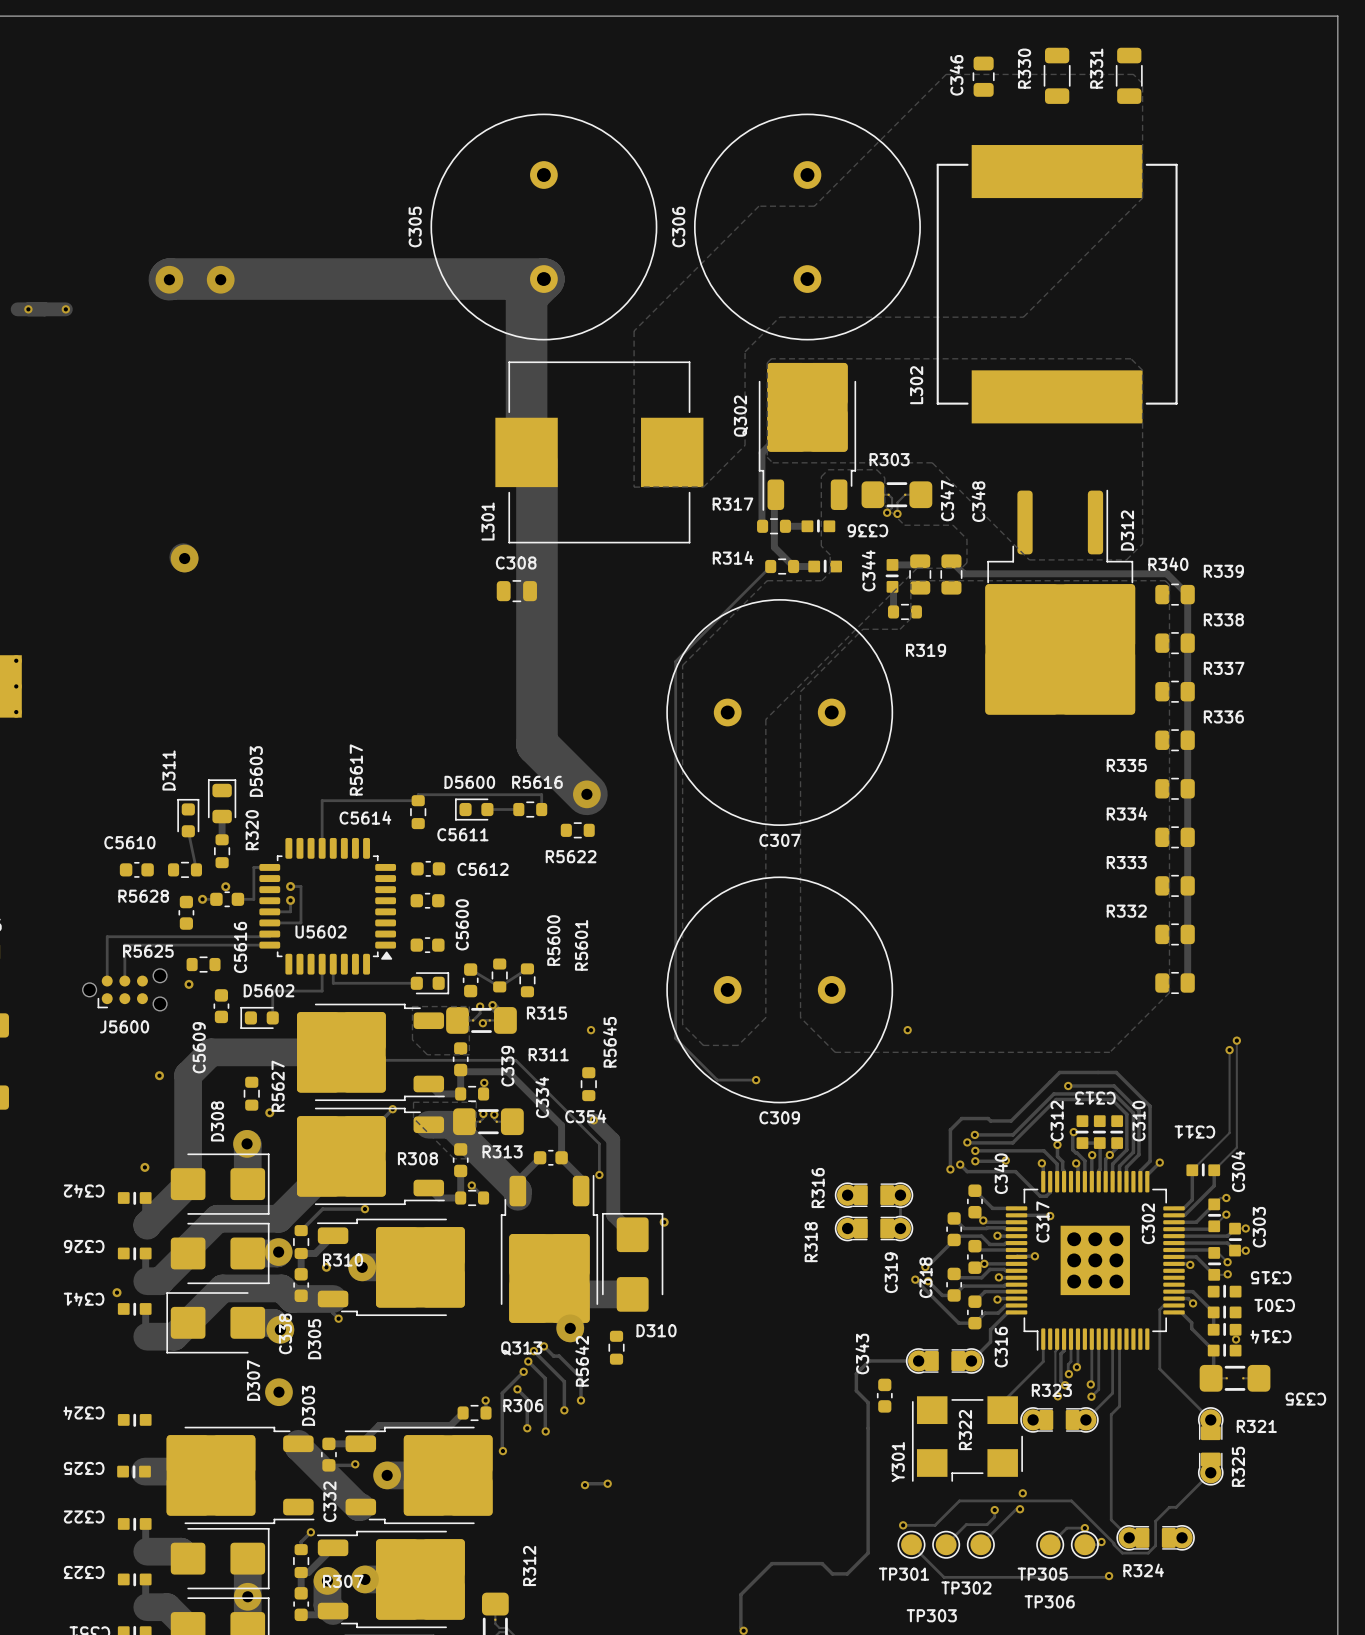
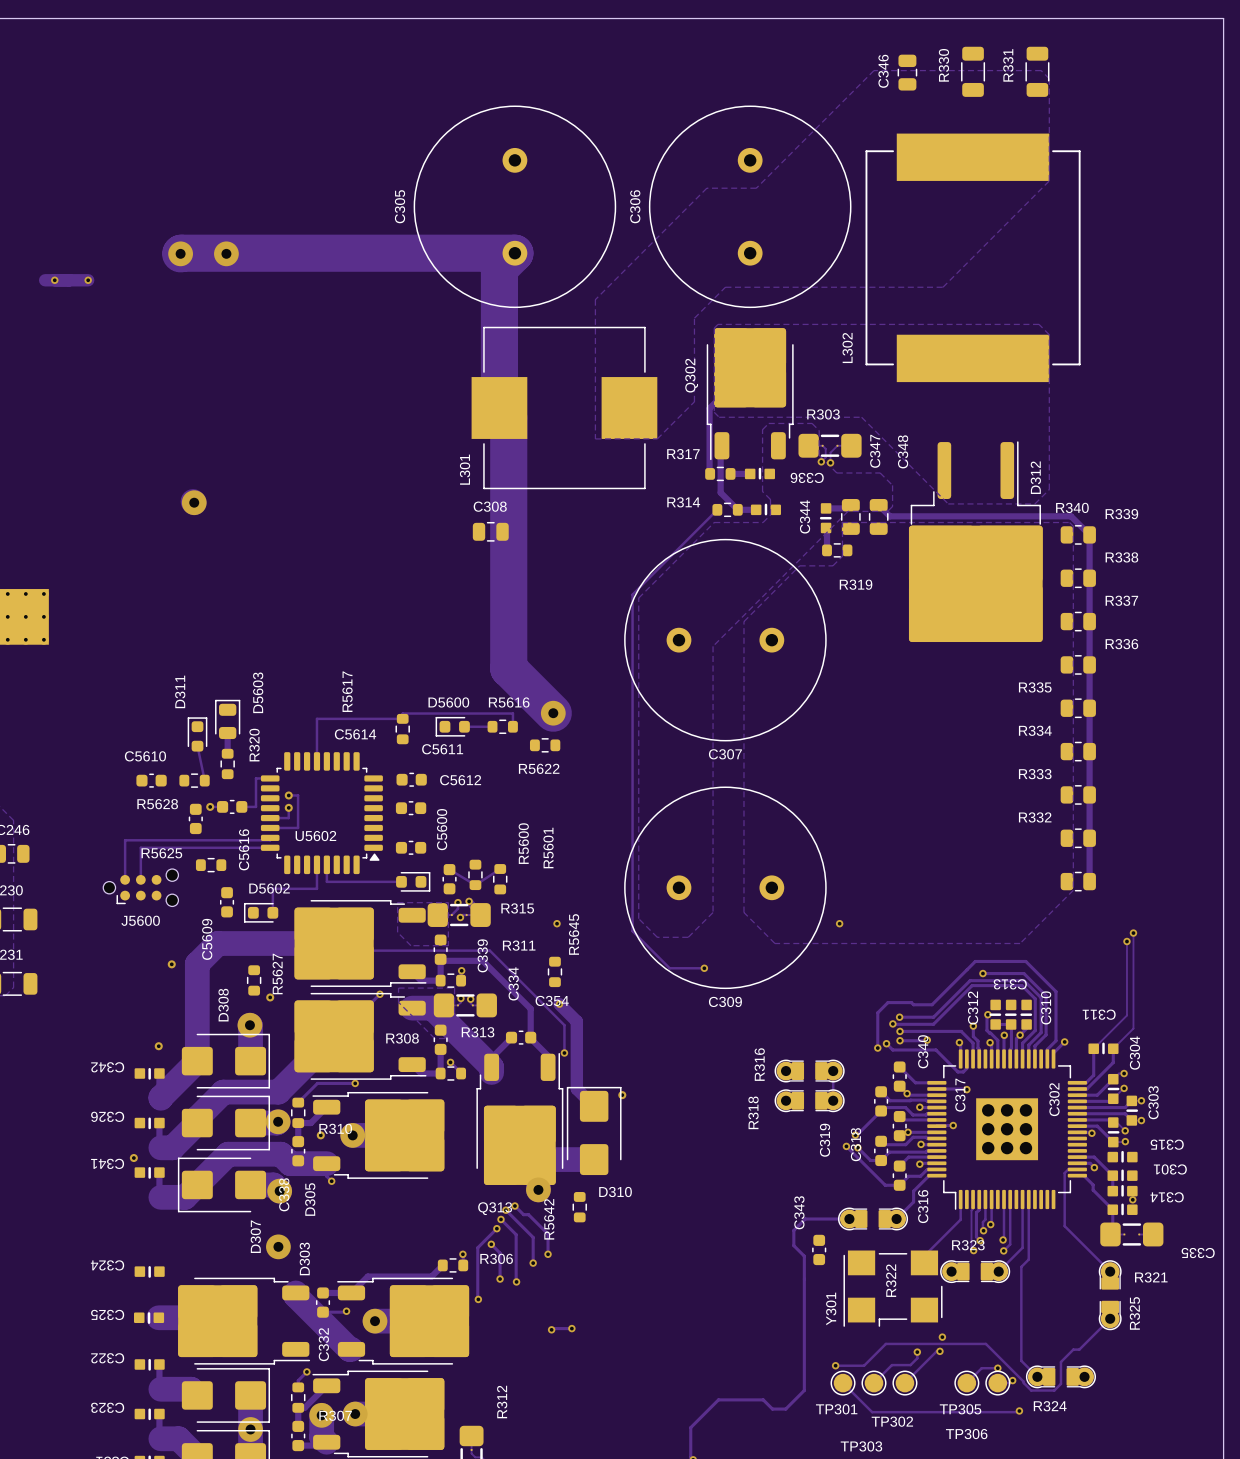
via: (225, 886) -> none
via: (188, 984) -> none

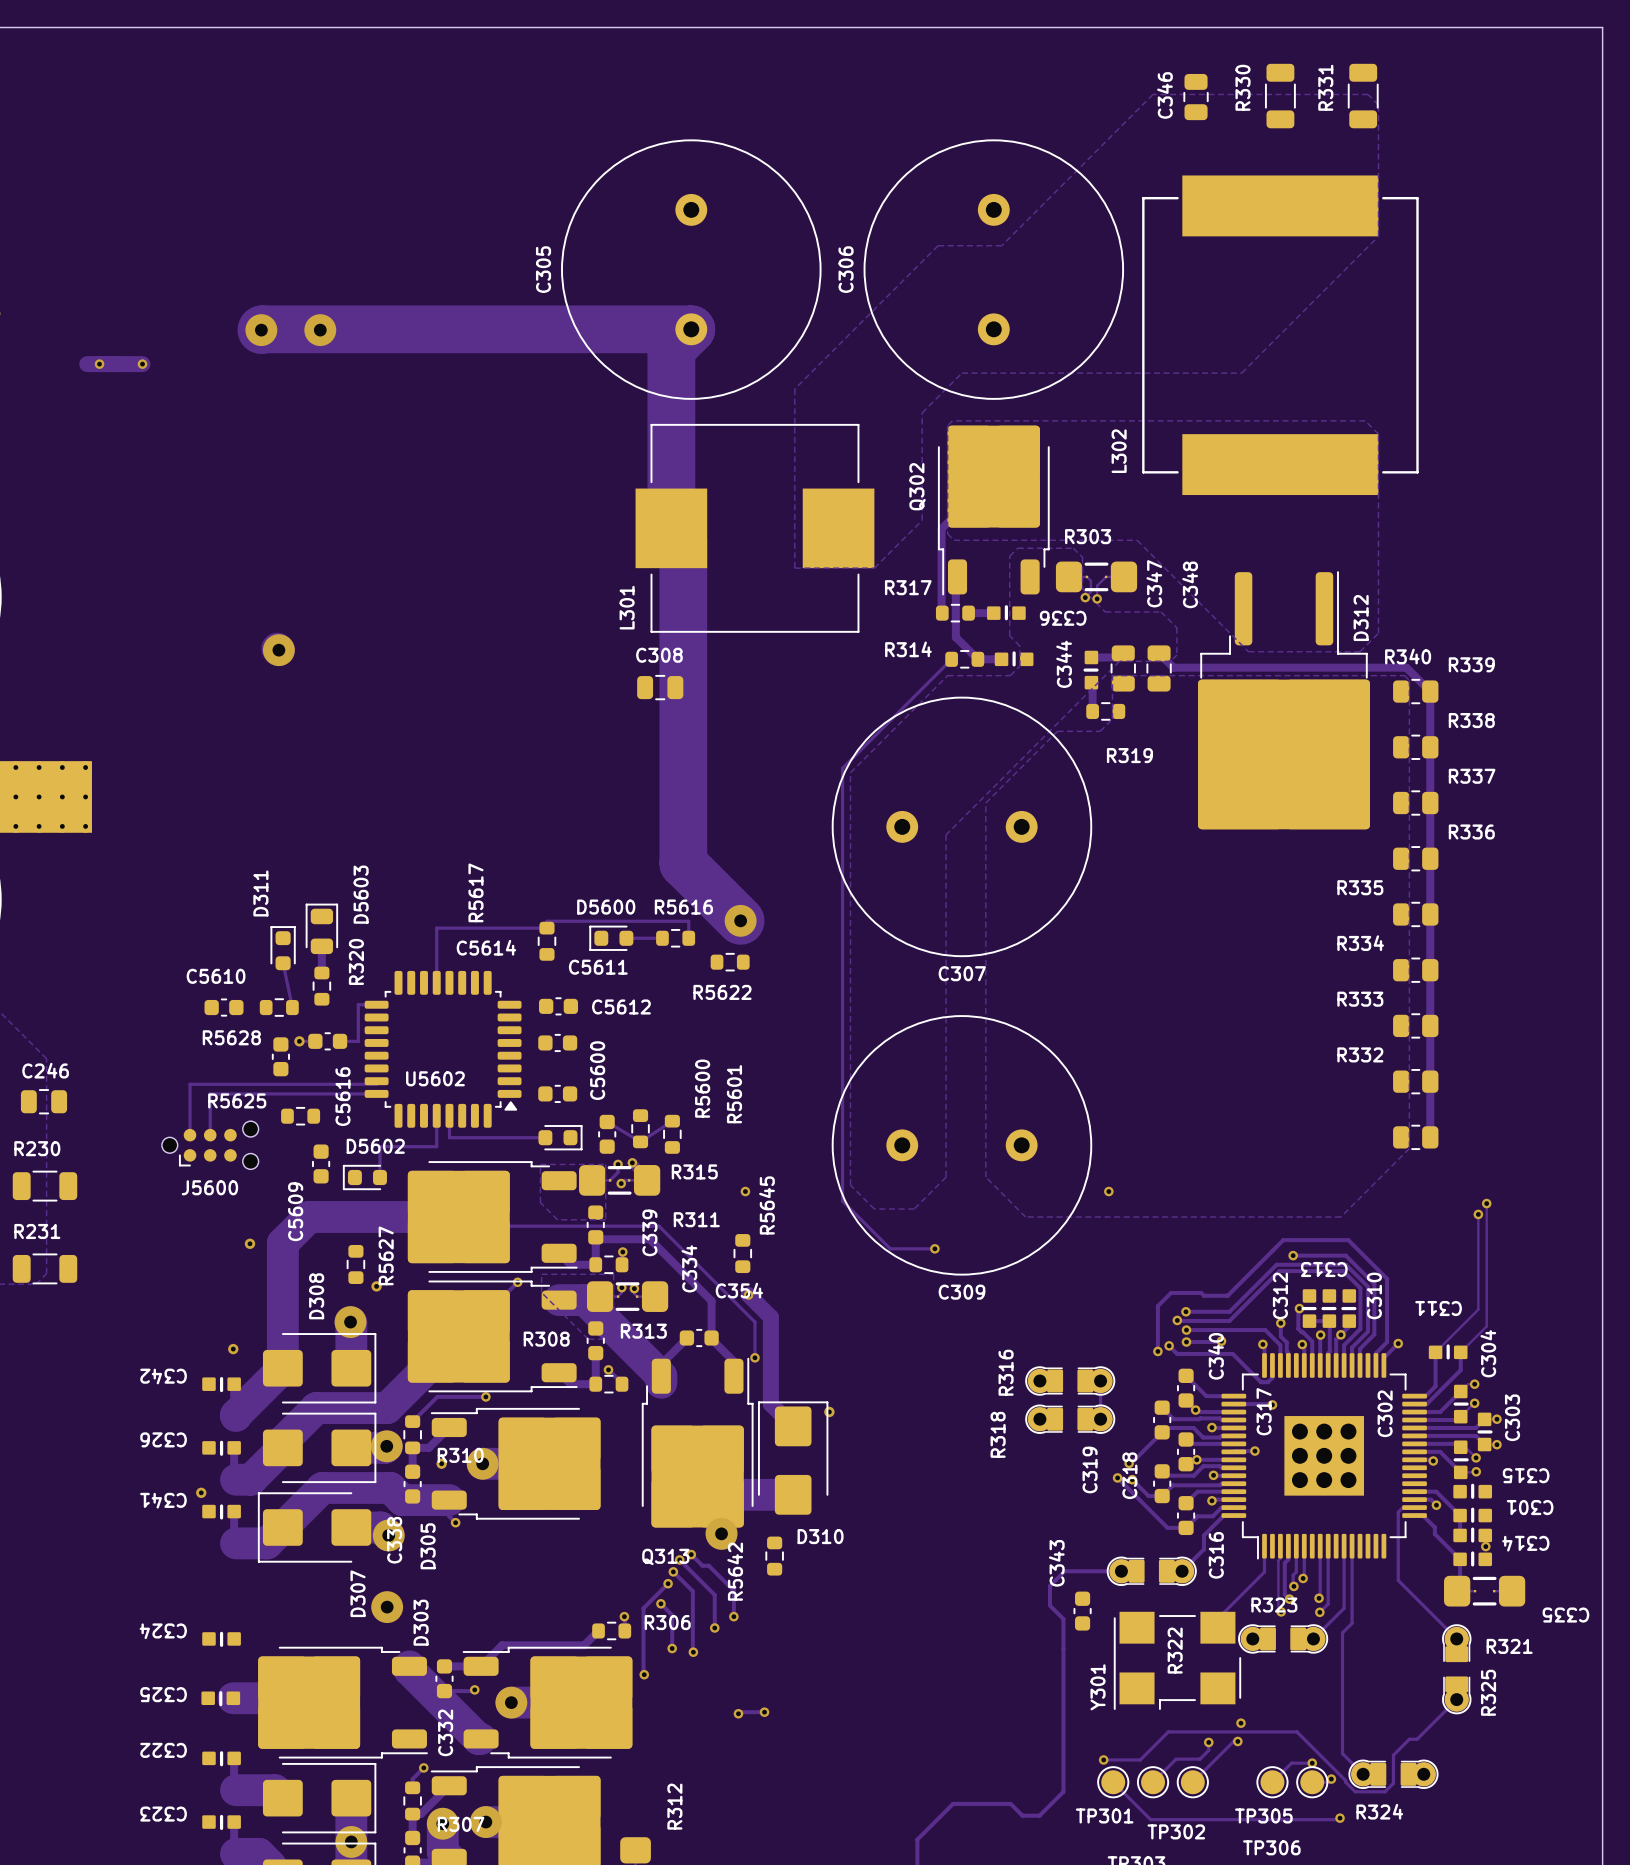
track: (288, 795) (298, 795) (298, 827) (270, 827) -> none
via: (288, 795) -> none
track: (288, 807) (288, 818) (270, 818) -> none
via: (288, 807) -> none

